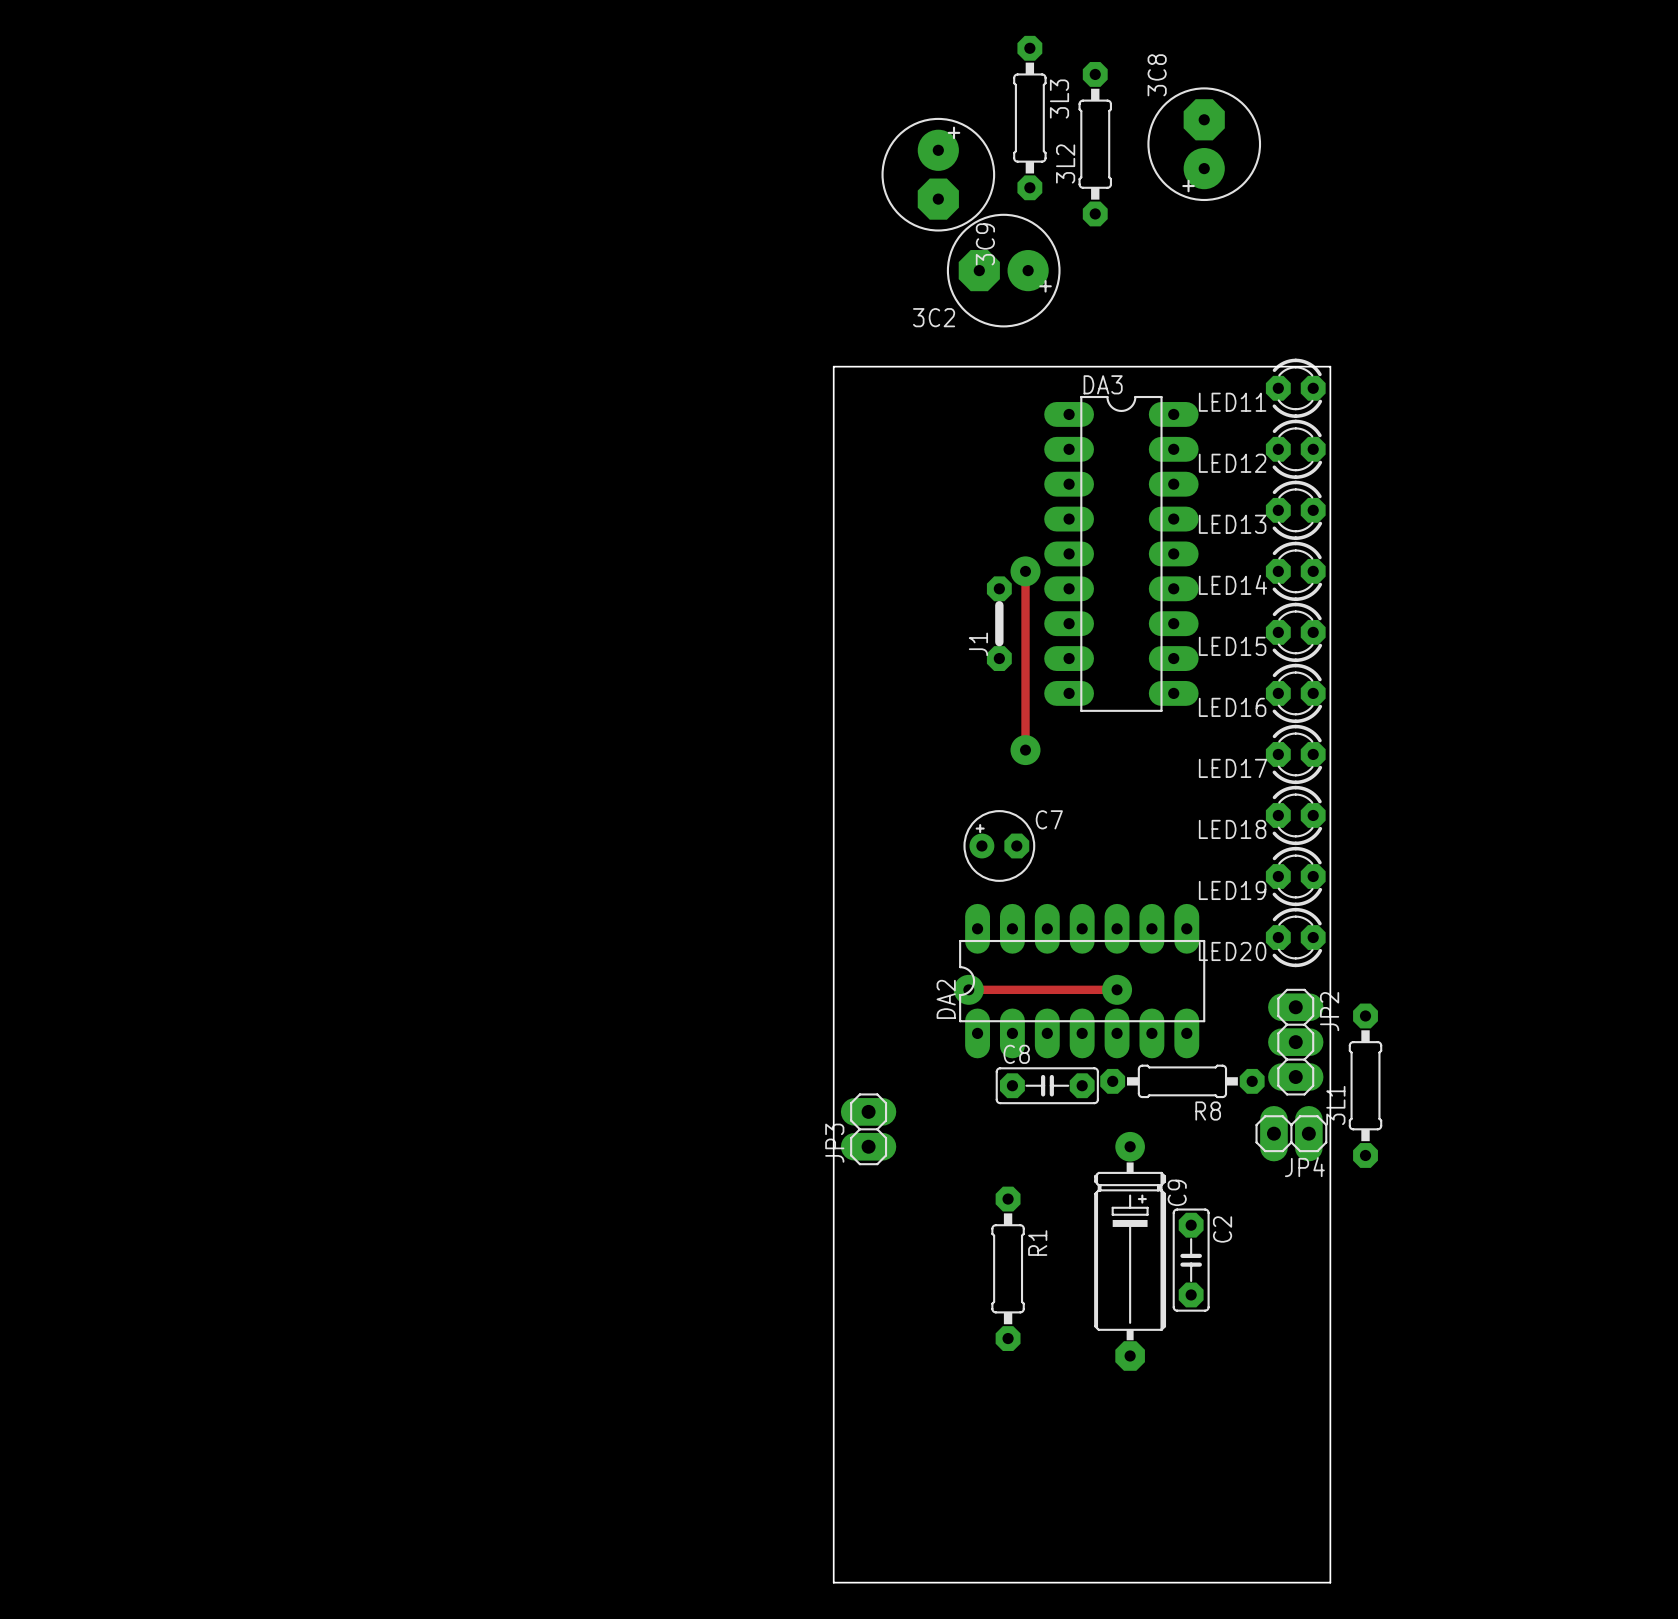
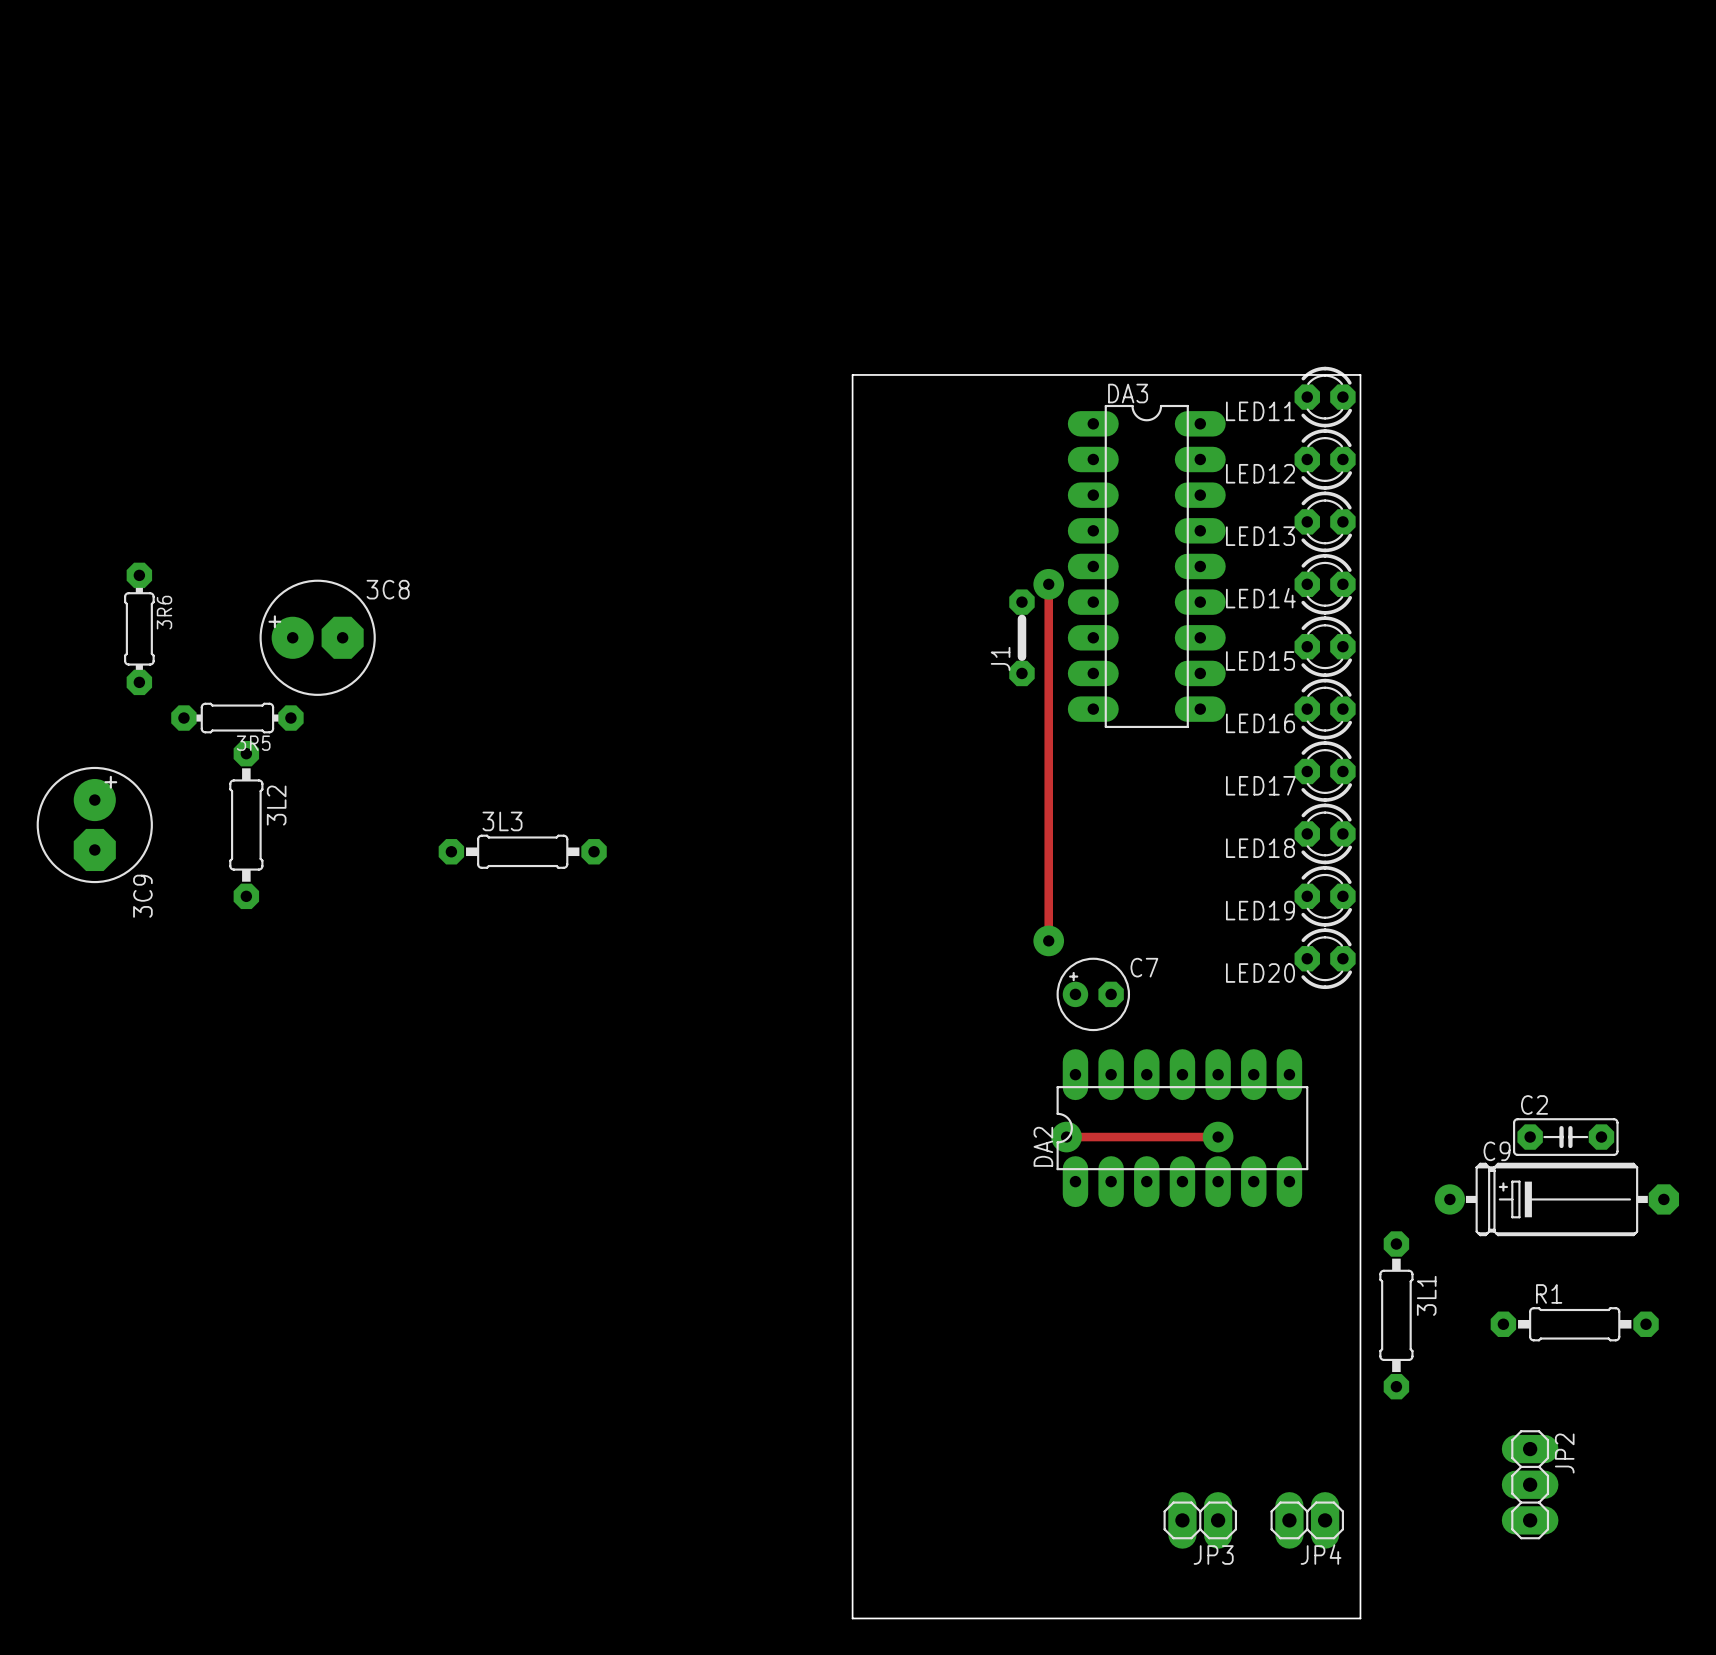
3L3 name position: 3L3 (1059, 99) -> 3L3 (502, 821)
3L3 rotation: 0° (1029, 118) -> 90° clockwise (522, 851)
3L3 position: (1029, 118) -> (522, 851)
3L2 position: (1095, 144) -> (246, 825)
3C8 rotation: 0° (1204, 144) -> 90° clockwise (317, 637)
3C8 position: (1204, 144) -> (317, 637)
3L2 name position: 3L2 (1065, 163) -> 3L2 (276, 805)
3C9 position: (938, 174) -> (94, 825)
3C2: (1003, 270) -> none
3R6: none -> (139, 628)
3R5: none -> (237, 718)
track: none -> (1048, 767) (1048, 940)
via: (1025, 750) -> none
C7 position: (999, 845) -> (1093, 994)
via: none -> (1048, 940)
DA2 position: (1082, 981) -> (1182, 1128)
track: (968, 989) (1117, 989) -> (1066, 1137) (1218, 1137)
via: (968, 989) -> none
via: (1117, 989) -> none
JP2 position: (1295, 1042) -> (1530, 1484)
R8: (1182, 1081) -> none
C8: (1047, 1085) -> none
3L1 position: (1365, 1085) -> (1396, 1315)
3L1 name position: 3L1 (1335, 1105) -> 3L1 (1426, 1295)
via: none -> (1066, 1137)
via: none -> (1218, 1137)
JP3 rotation: 0° (868, 1129) -> 90° clockwise (1200, 1520)
JP3 position: (868, 1129) -> (1200, 1520)
JP4 position: (1291, 1133) -> (1307, 1520)
JP3 name position: JP3 (834, 1143) -> JP3 (1213, 1554)
R1 name position: R1 (1037, 1243) -> R1 (1549, 1293)
C9 rotation: 0° (1130, 1251) -> 90° counterclockwise (1556, 1199)
C9 position: (1130, 1251) -> (1556, 1199)
C2 rotation: 0° (1191, 1260) -> 90° counterclockwise (1565, 1137)
C2 position: (1191, 1260) -> (1565, 1137)
R1 rotation: 0° (1008, 1268) -> 90° clockwise (1574, 1324)
R1 position: (1008, 1268) -> (1574, 1324)

